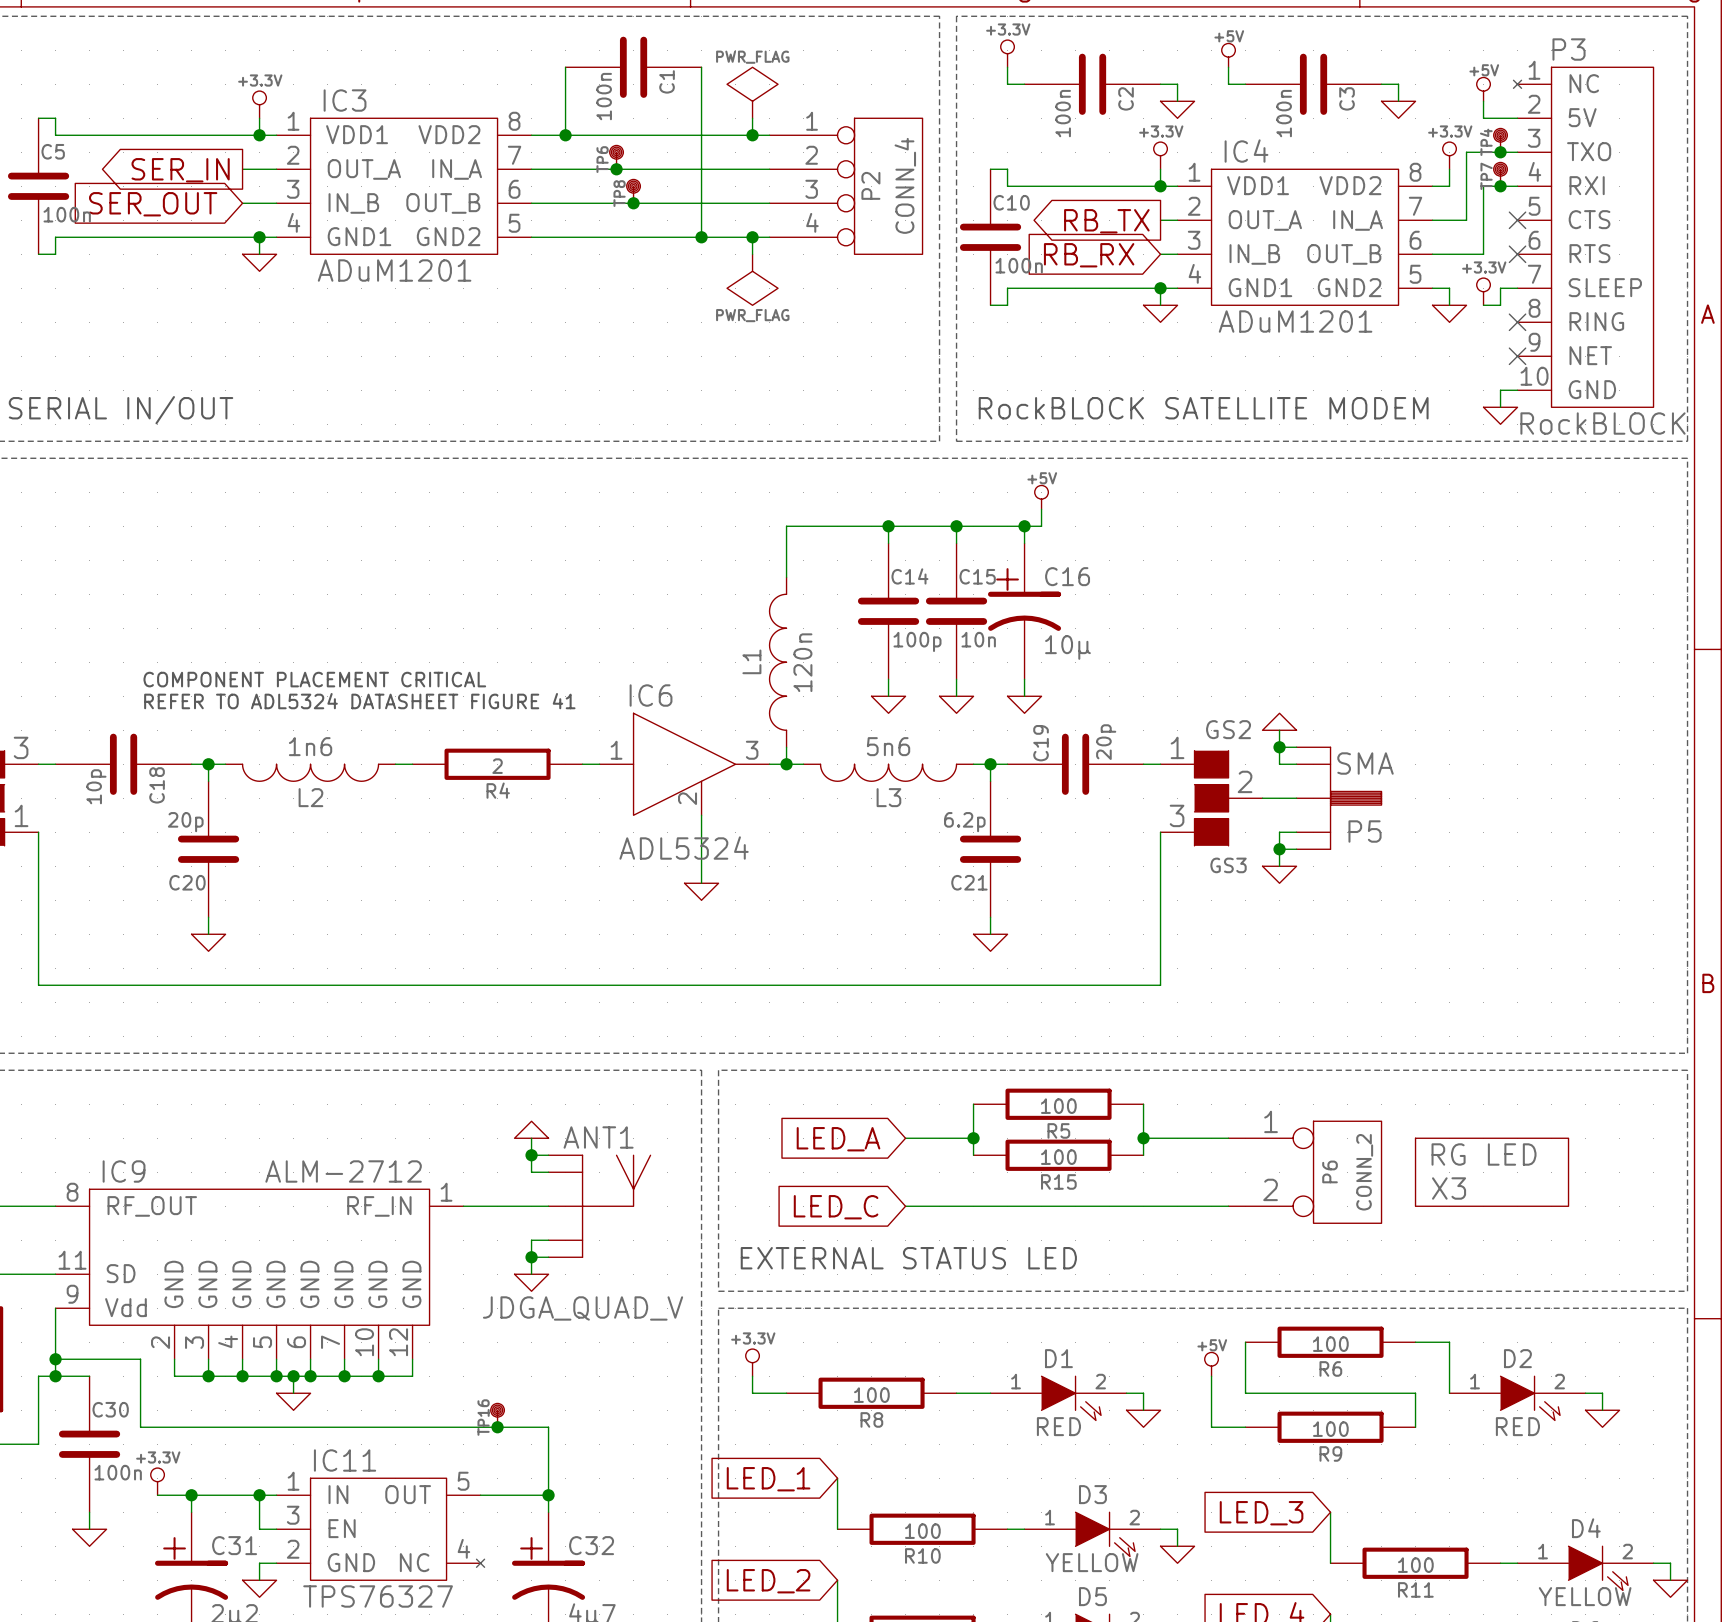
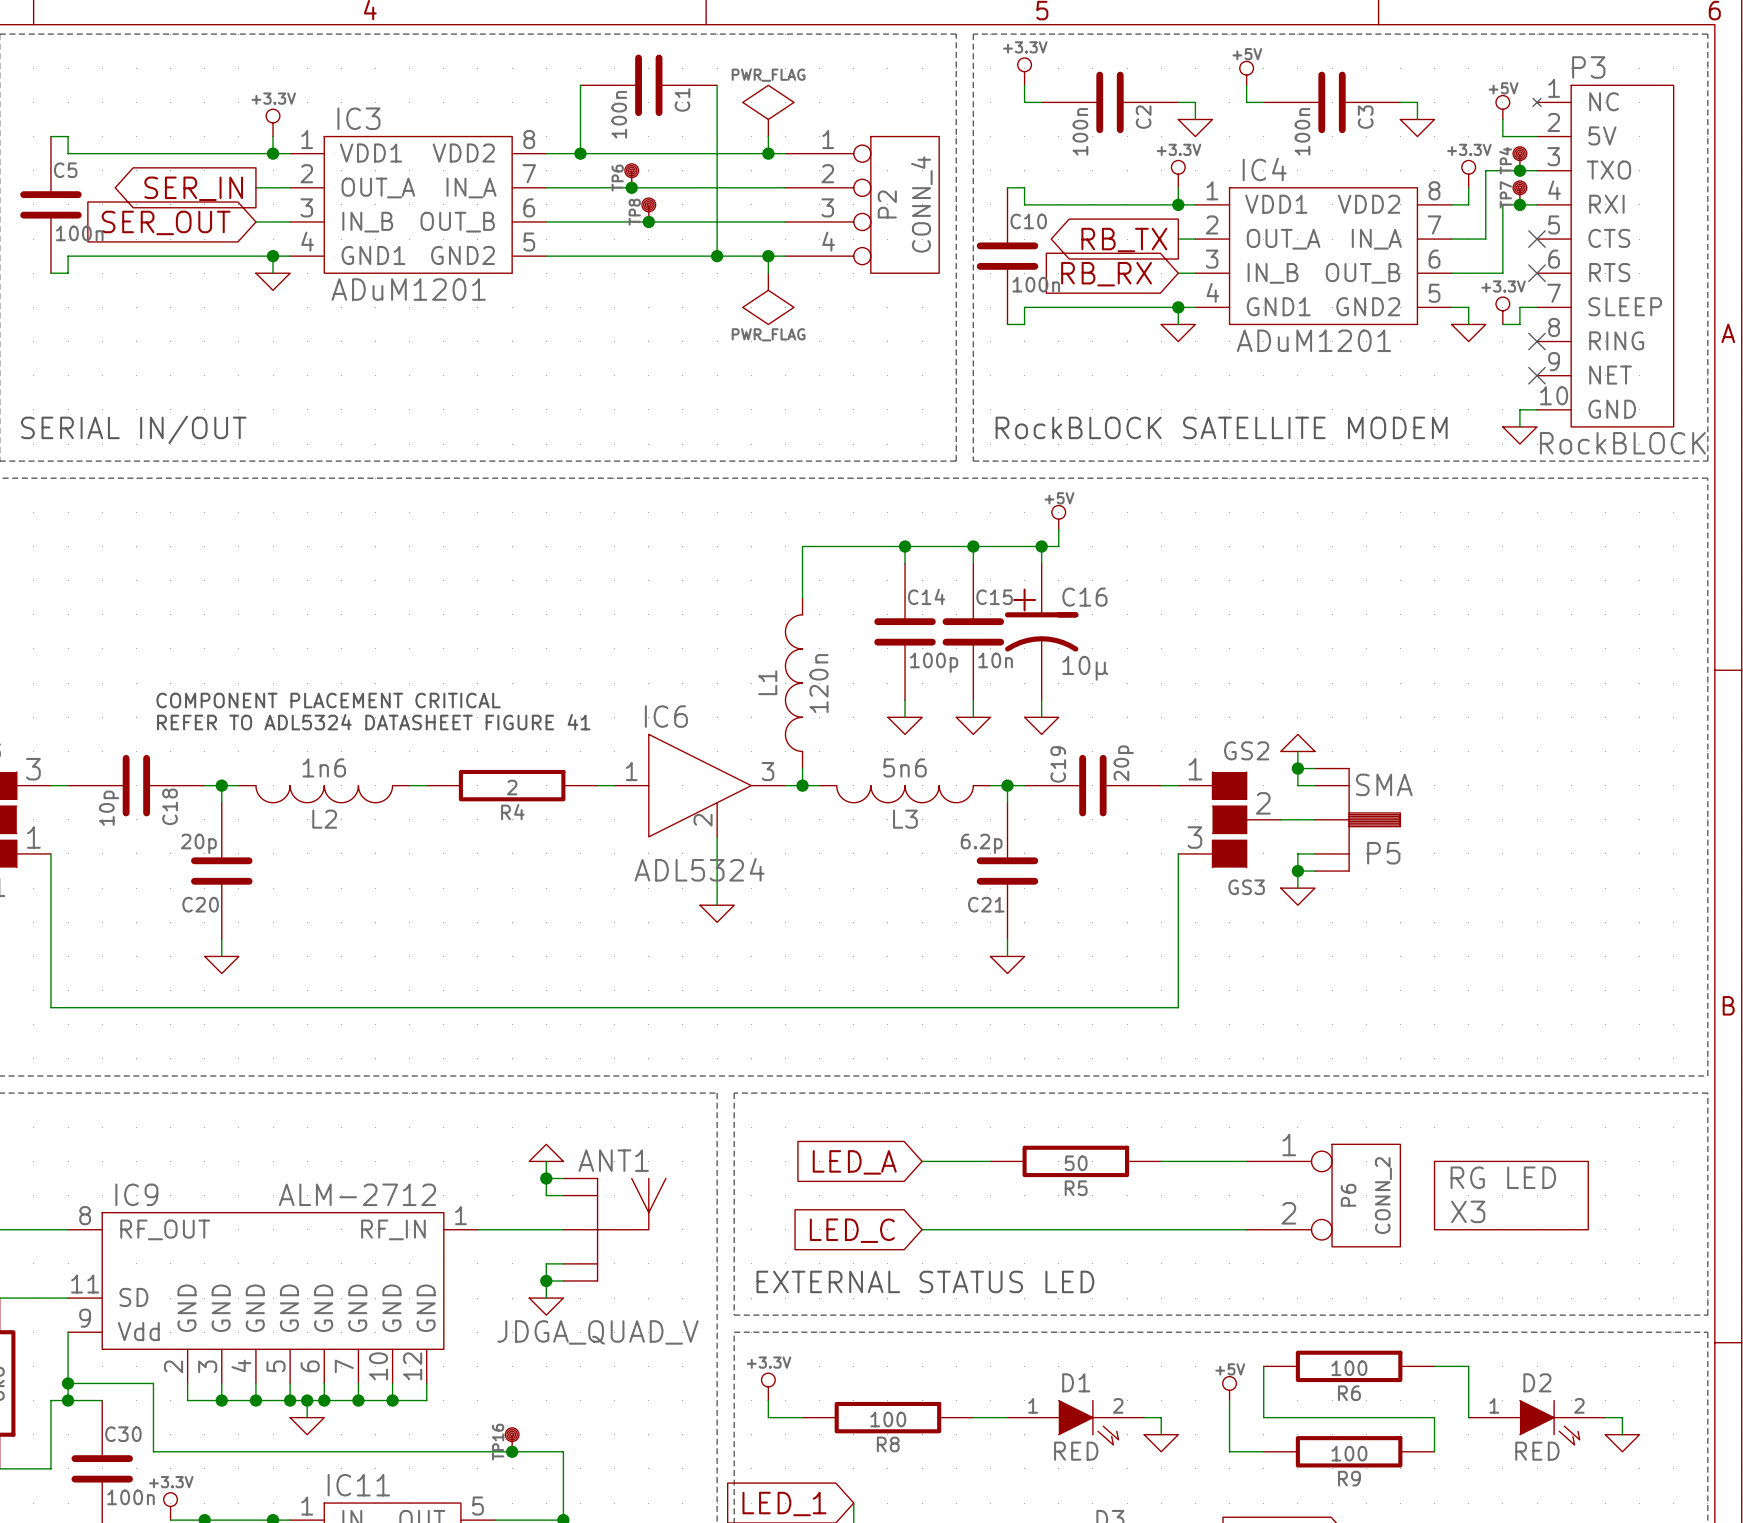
wire: (973, 1104) (973, 1155) -> none
R5 position: (1058, 1104) -> (1075, 1161)
wire: (1143, 1104) (1143, 1155) -> none
R5 value: 100 (1058, 1106) -> 50 (1076, 1163)
junction: (973, 1138) -> none
junction: (1143, 1138) -> none
R15: 100 (1058, 1155) -> none

